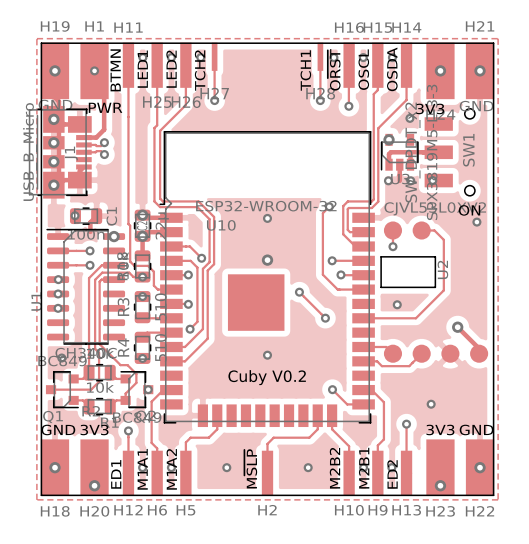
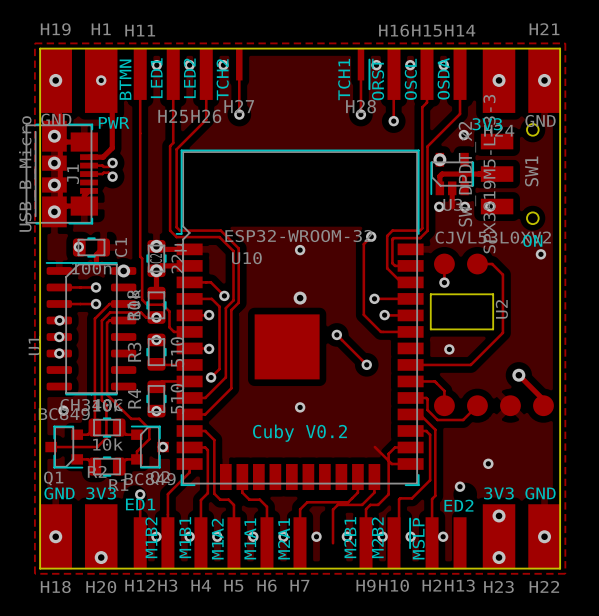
track: none -> (410, 381) (434, 381)
track: none -> (434, 381) (444, 391) (444, 405)
track: (377, 346) (386, 346) (392, 353) -> (426, 397) (427, 409) (437, 420)
track: (371, 361) (377, 361) (381, 366) (387, 366) -> (419, 414) (435, 429) (435, 495) (432, 499) (432, 543)
track: none -> (189, 430) (205, 430) (214, 440) (214, 493) (220, 499) (228, 499) (233, 505) (233, 543)
track: none -> (410, 430) (426, 430) (430, 434) (430, 480) (411, 498) (399, 499) (399, 543)
via: (332, 389) -> none
track: (171, 390) (163, 390) (151, 401) (151, 442) (157, 448) (157, 473) -> (189, 447) (205, 447) (207, 450) (207, 493) (200, 500) (200, 543)
track: (363, 390) (371, 390) (383, 402) (383, 439) (377, 445) (377, 473) -> (410, 447) (395, 447) (388, 453) (388, 494) (378, 504) (370, 504) (366, 509) (366, 543)
track: none -> (189, 464) (189, 472) (167, 494) (167, 543)
track: (406, 424) (406, 473) -> none
track: (217, 429) (208, 437) (190, 437) (185, 442) (185, 473) -> (242, 492) (249, 499) (259, 499) (266, 506) (266, 543)
track: (332, 429) (349, 446) (349, 473) -> (374, 492) (362, 504) (337, 504) (333, 509) (333, 543)
via: none -> (499, 515)
via: none -> (217, 536)
via: none -> (283, 536)
via: none -> (316, 536)
via: none -> (382, 536)
H2 value: M~{SLP} (250, 468) -> M2A1 (283, 538)
H3: none -> M1B2 (167, 543)
H6 position: (157, 473) -> (266, 543)
H4: none -> M1B1 (200, 543)
H5 position: (185, 473) -> (233, 543)
H9 position: (377, 473) -> (366, 543)
H2: none -> M~{SLP} (432, 543)
H12 value rotation: 0° (116, 474) -> 90° clockwise (140, 504)
H13 value rotation: 0° (392, 474) -> 90° clockwise (458, 505)
H2 name: H2 (267, 510) -> H7 (299, 585)

